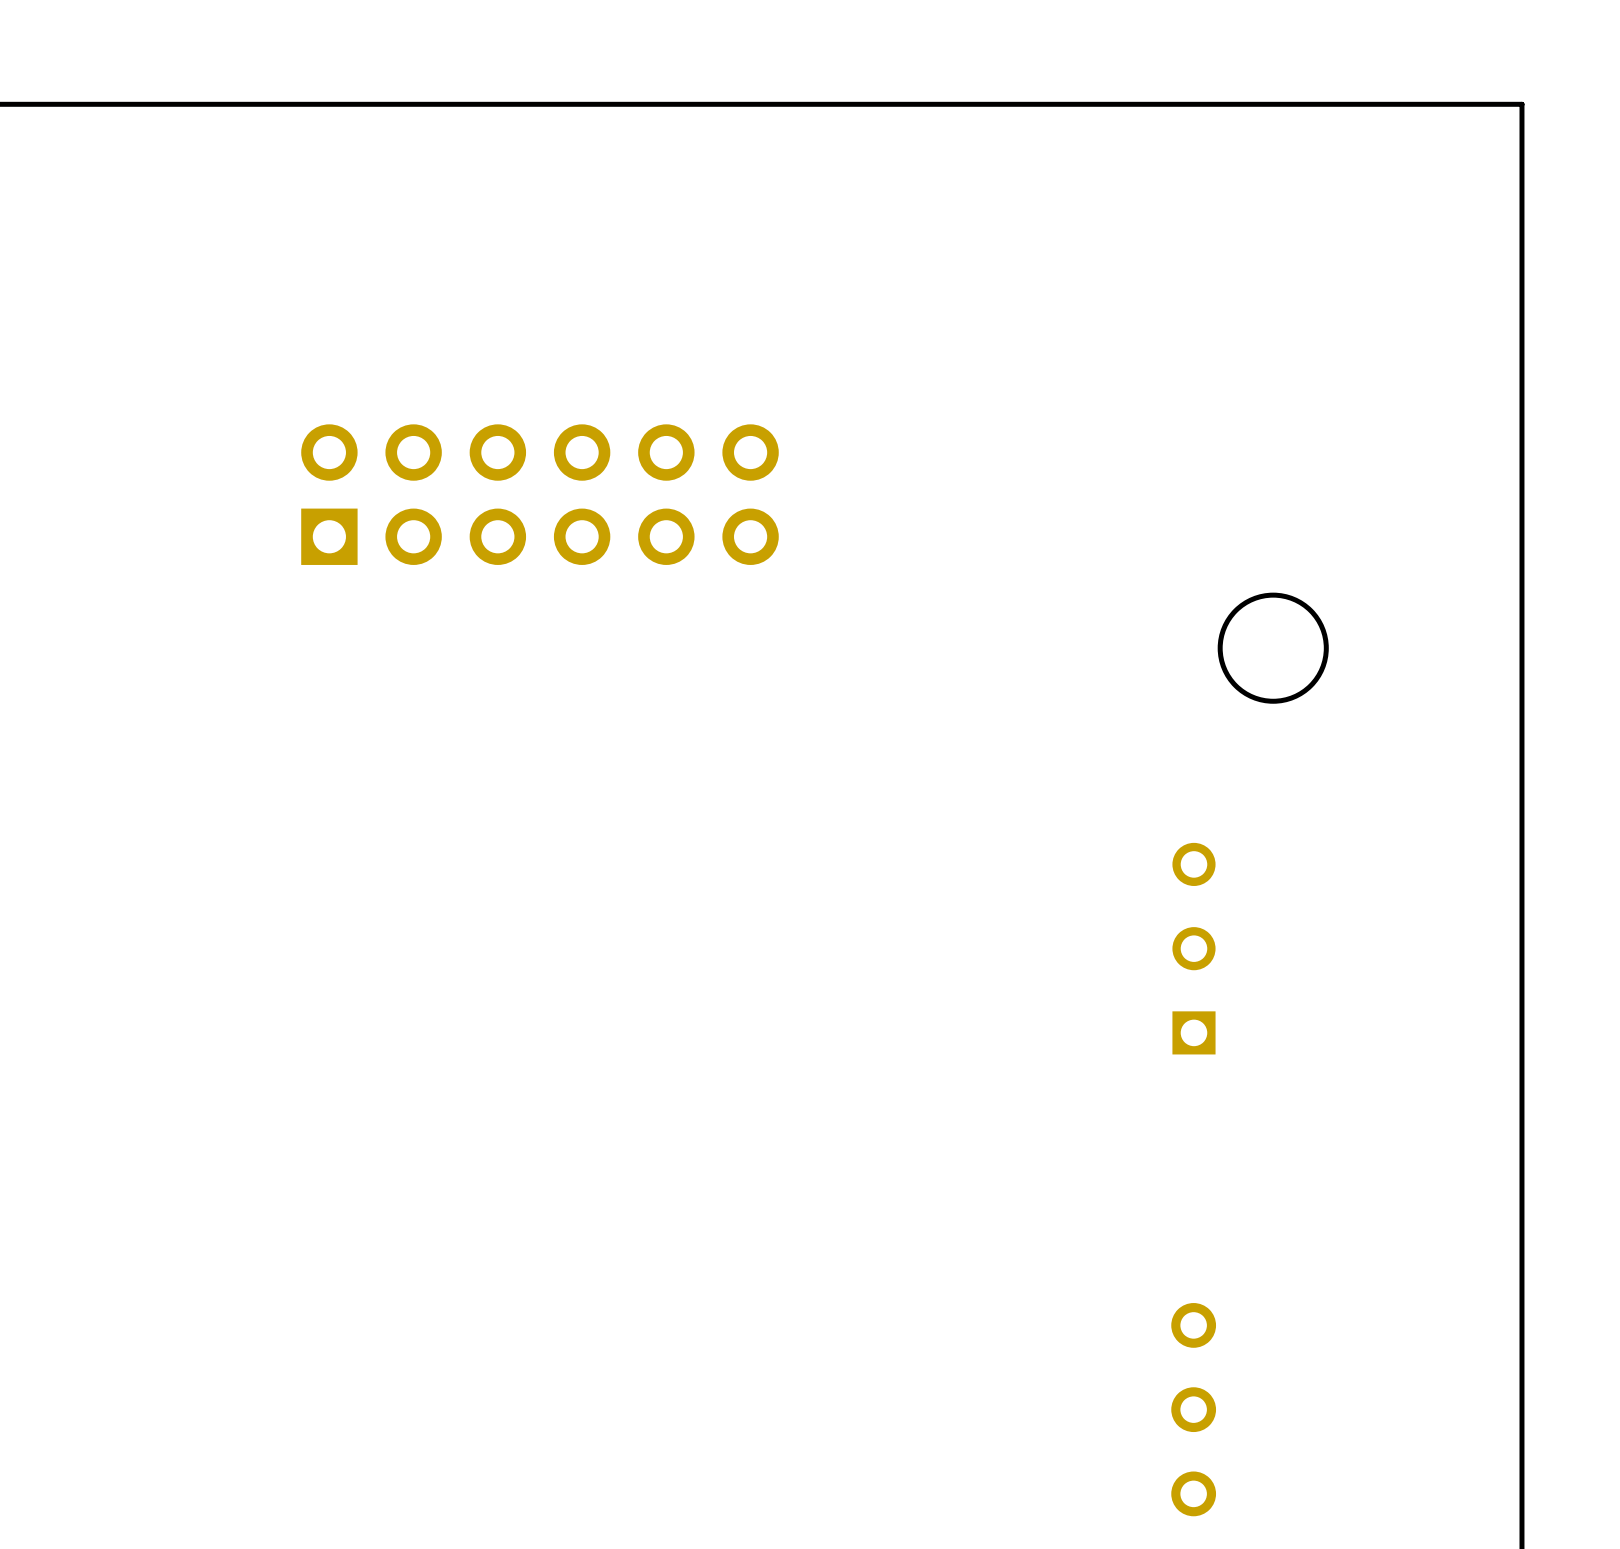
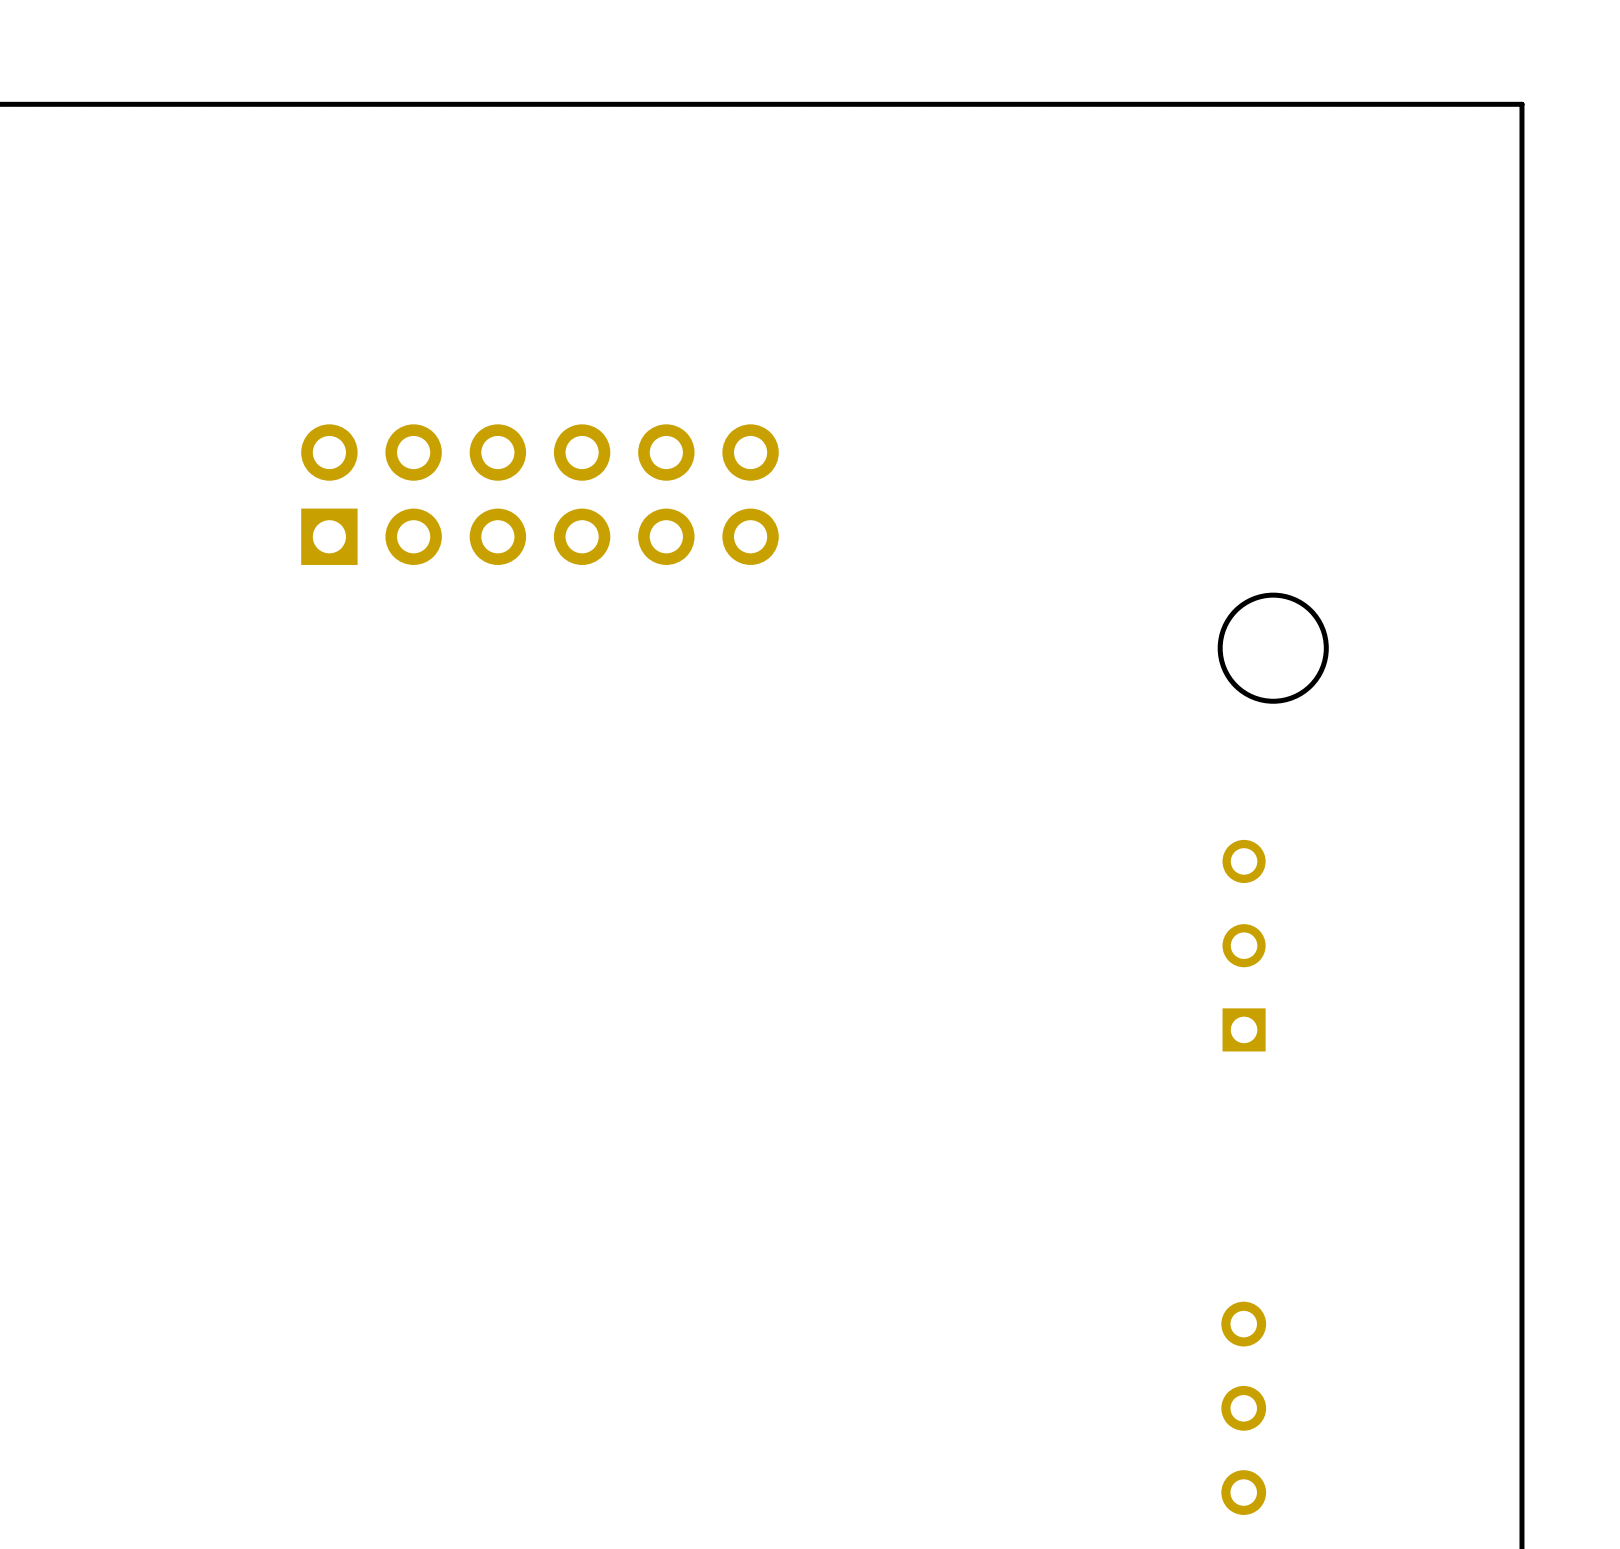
part position: (1193, 948) -> (1244, 945)
part position: (1193, 1409) -> (1243, 1408)

